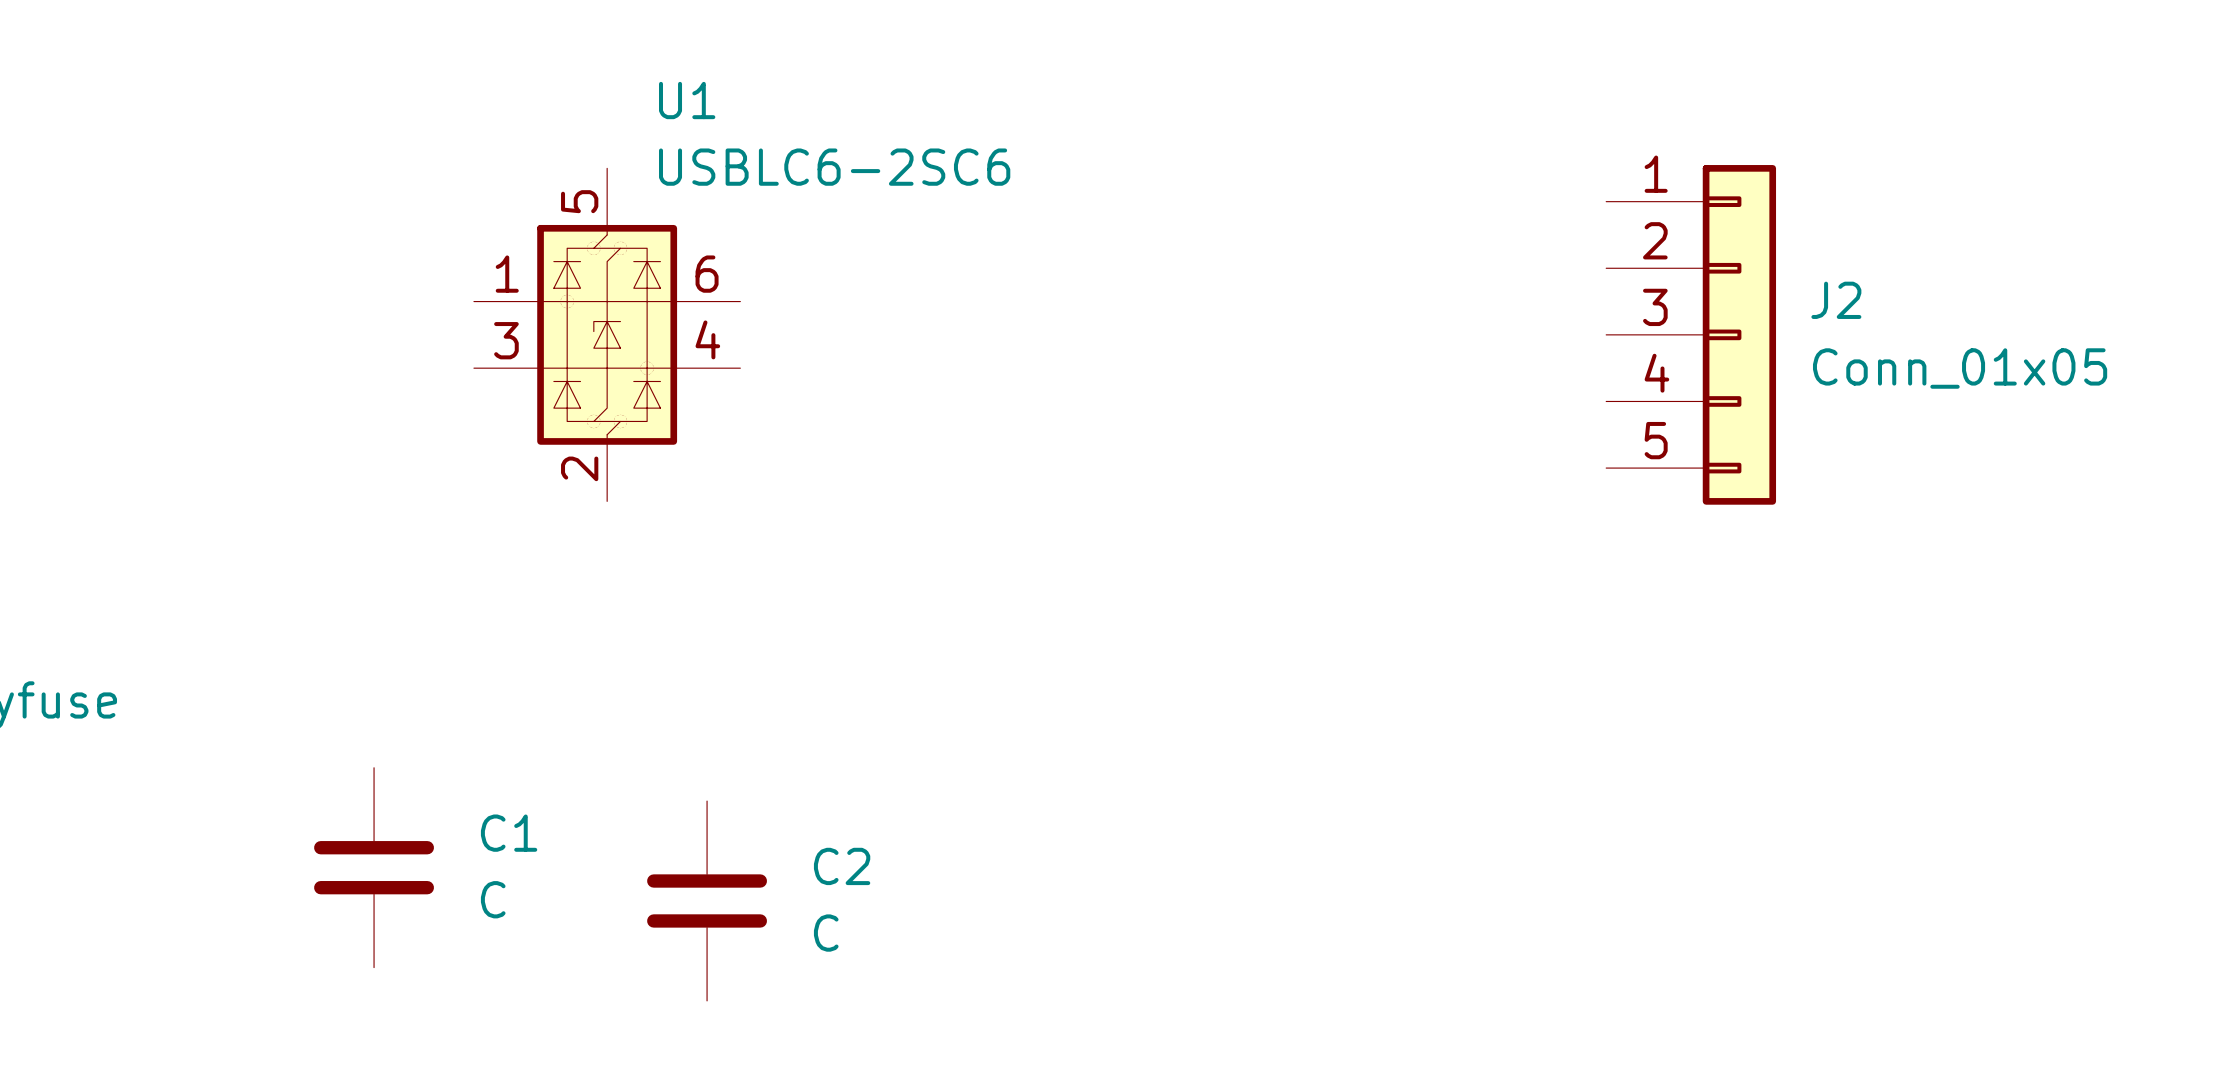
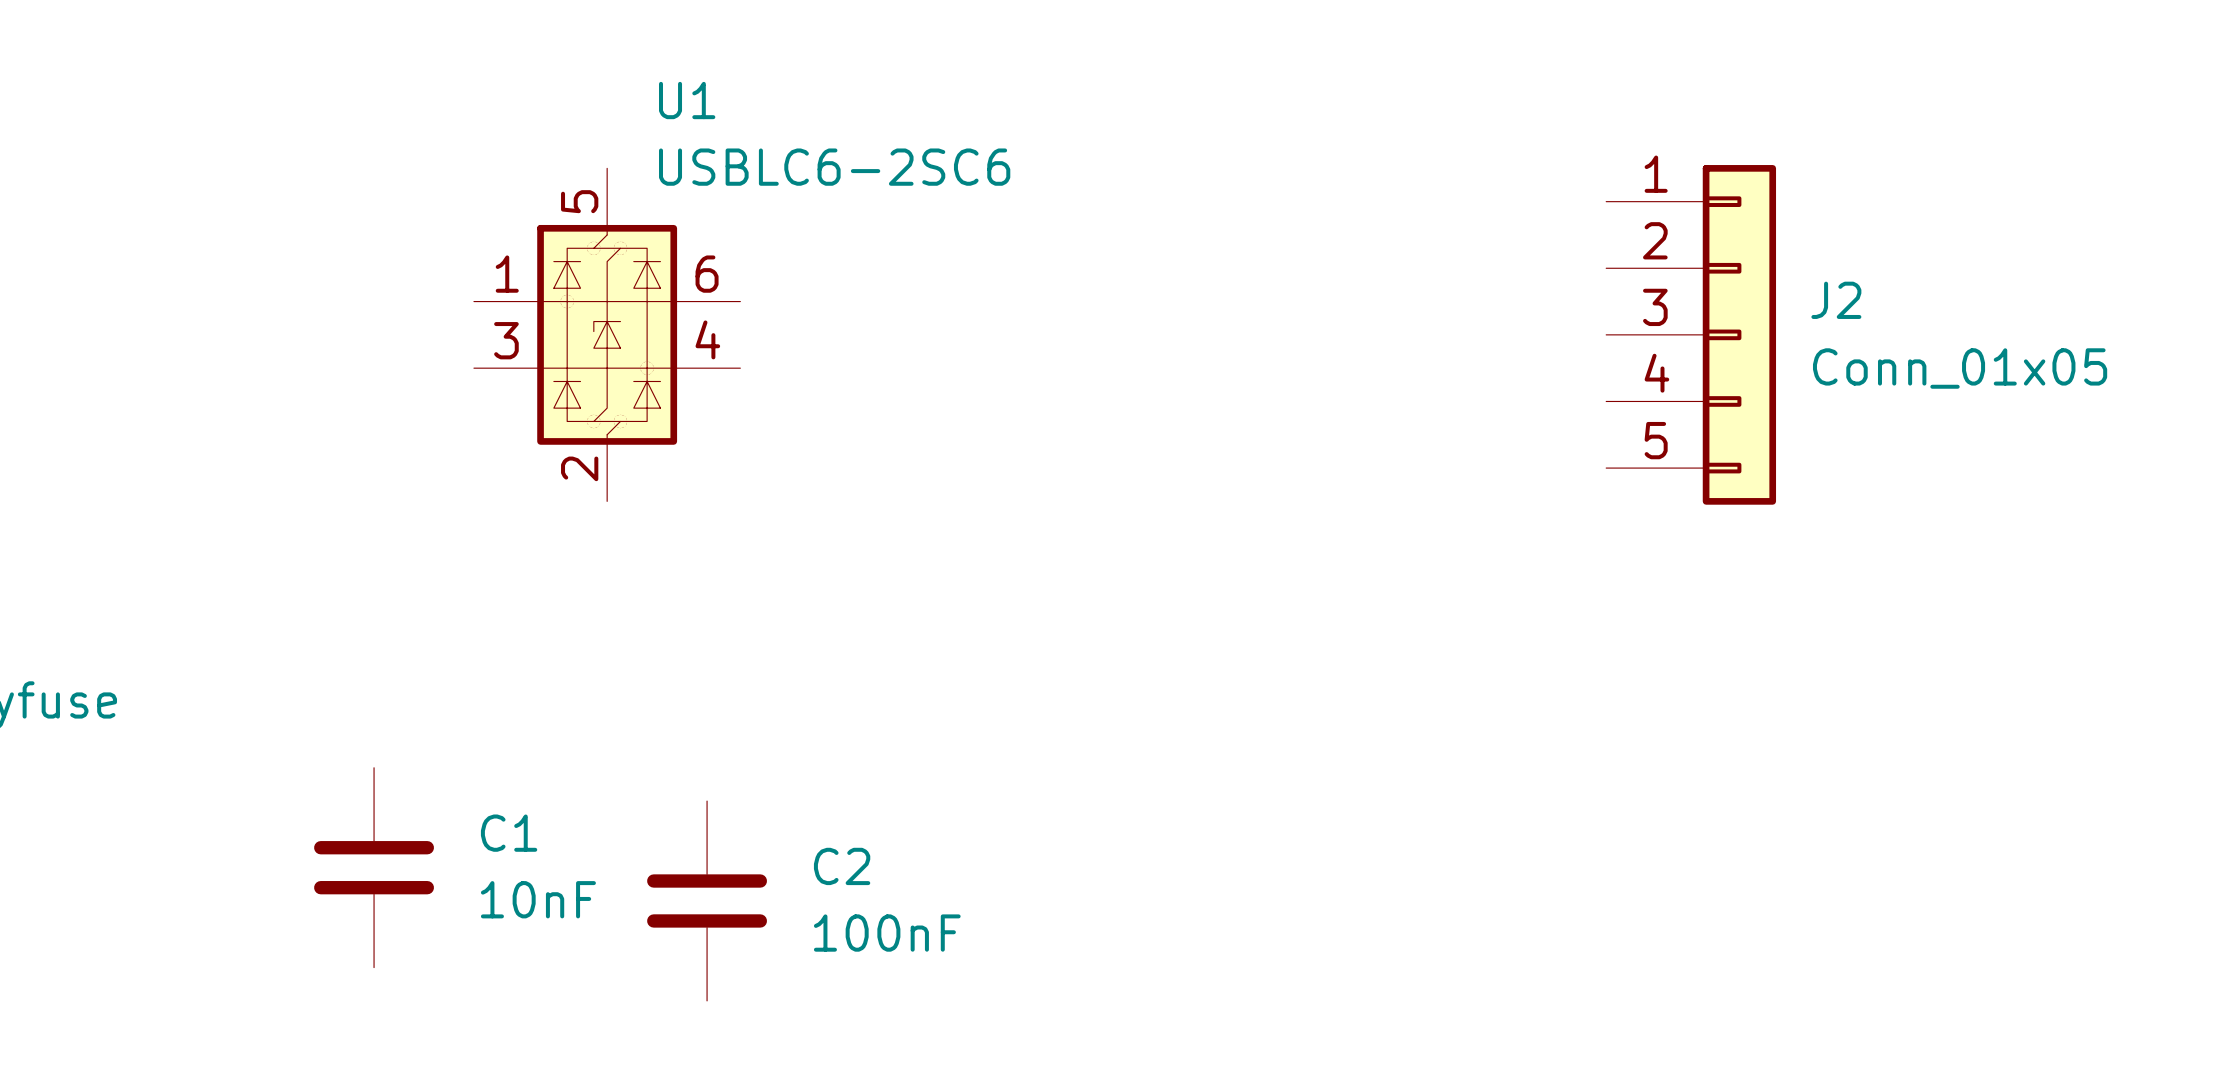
C1 value: C (493, 899) -> 10nF (538, 899)
C2 value: C (826, 933) -> 100nF (887, 933)

